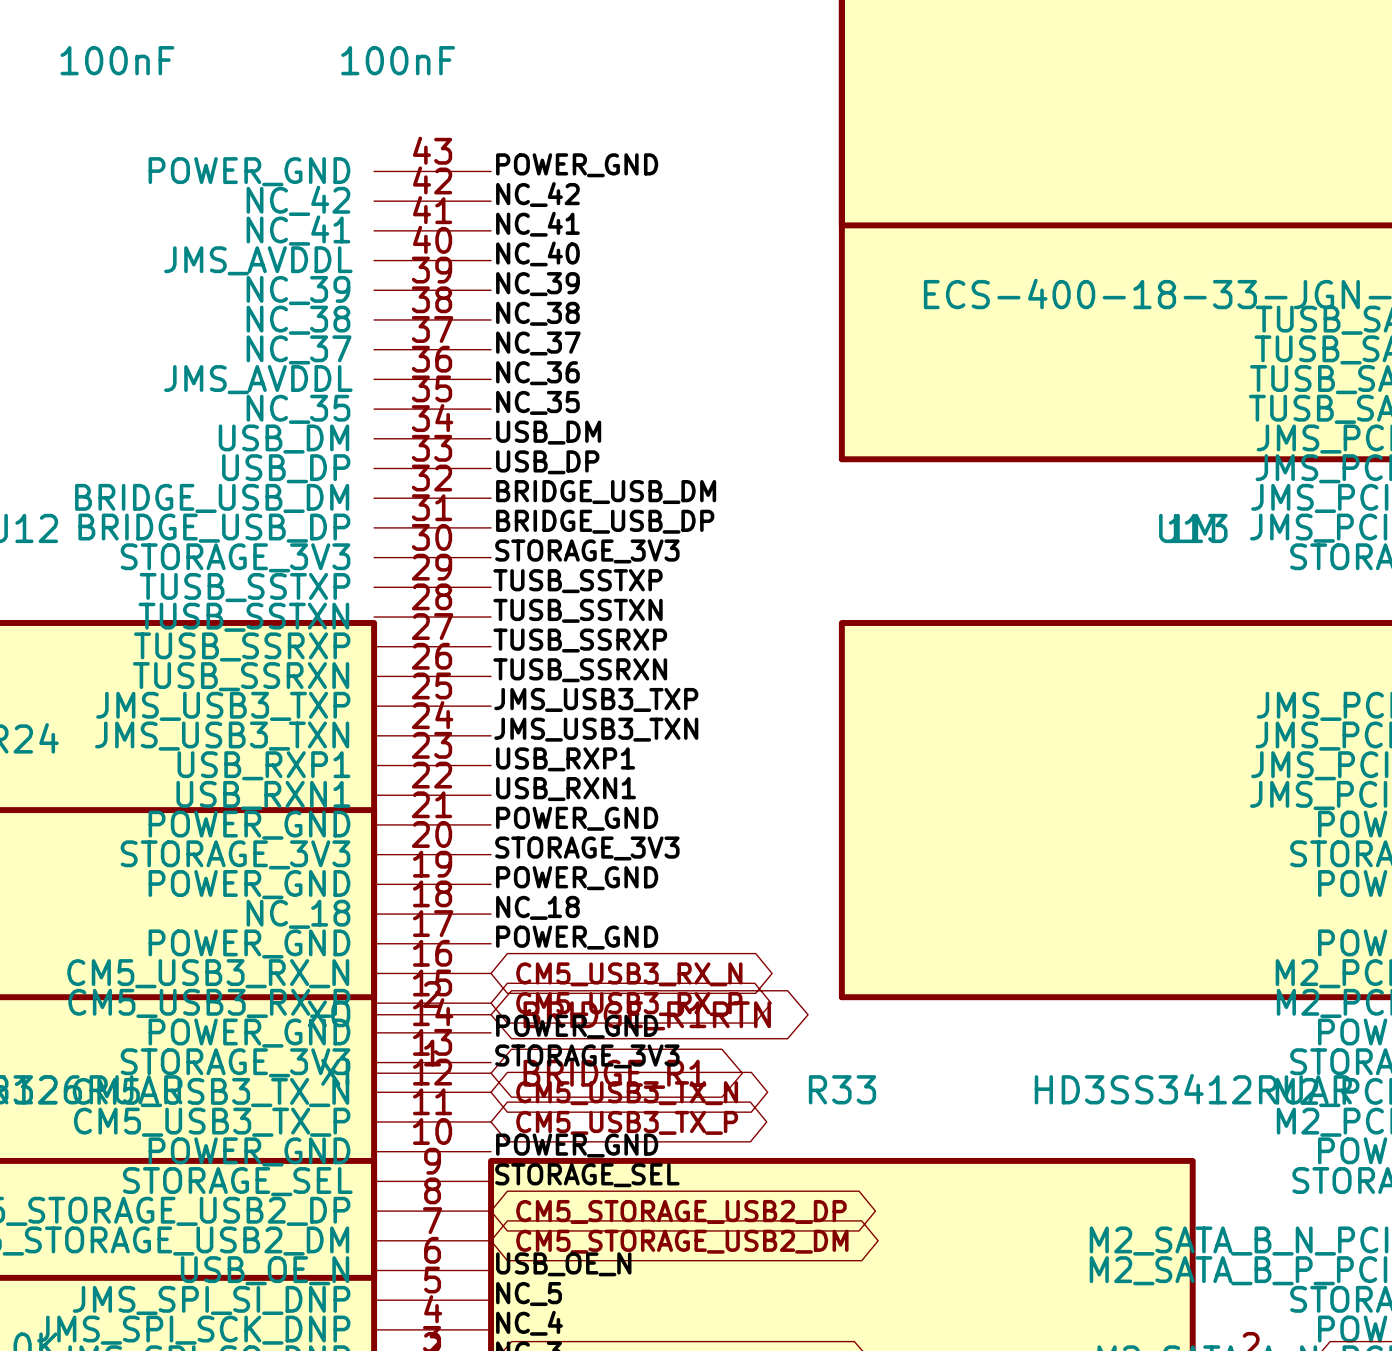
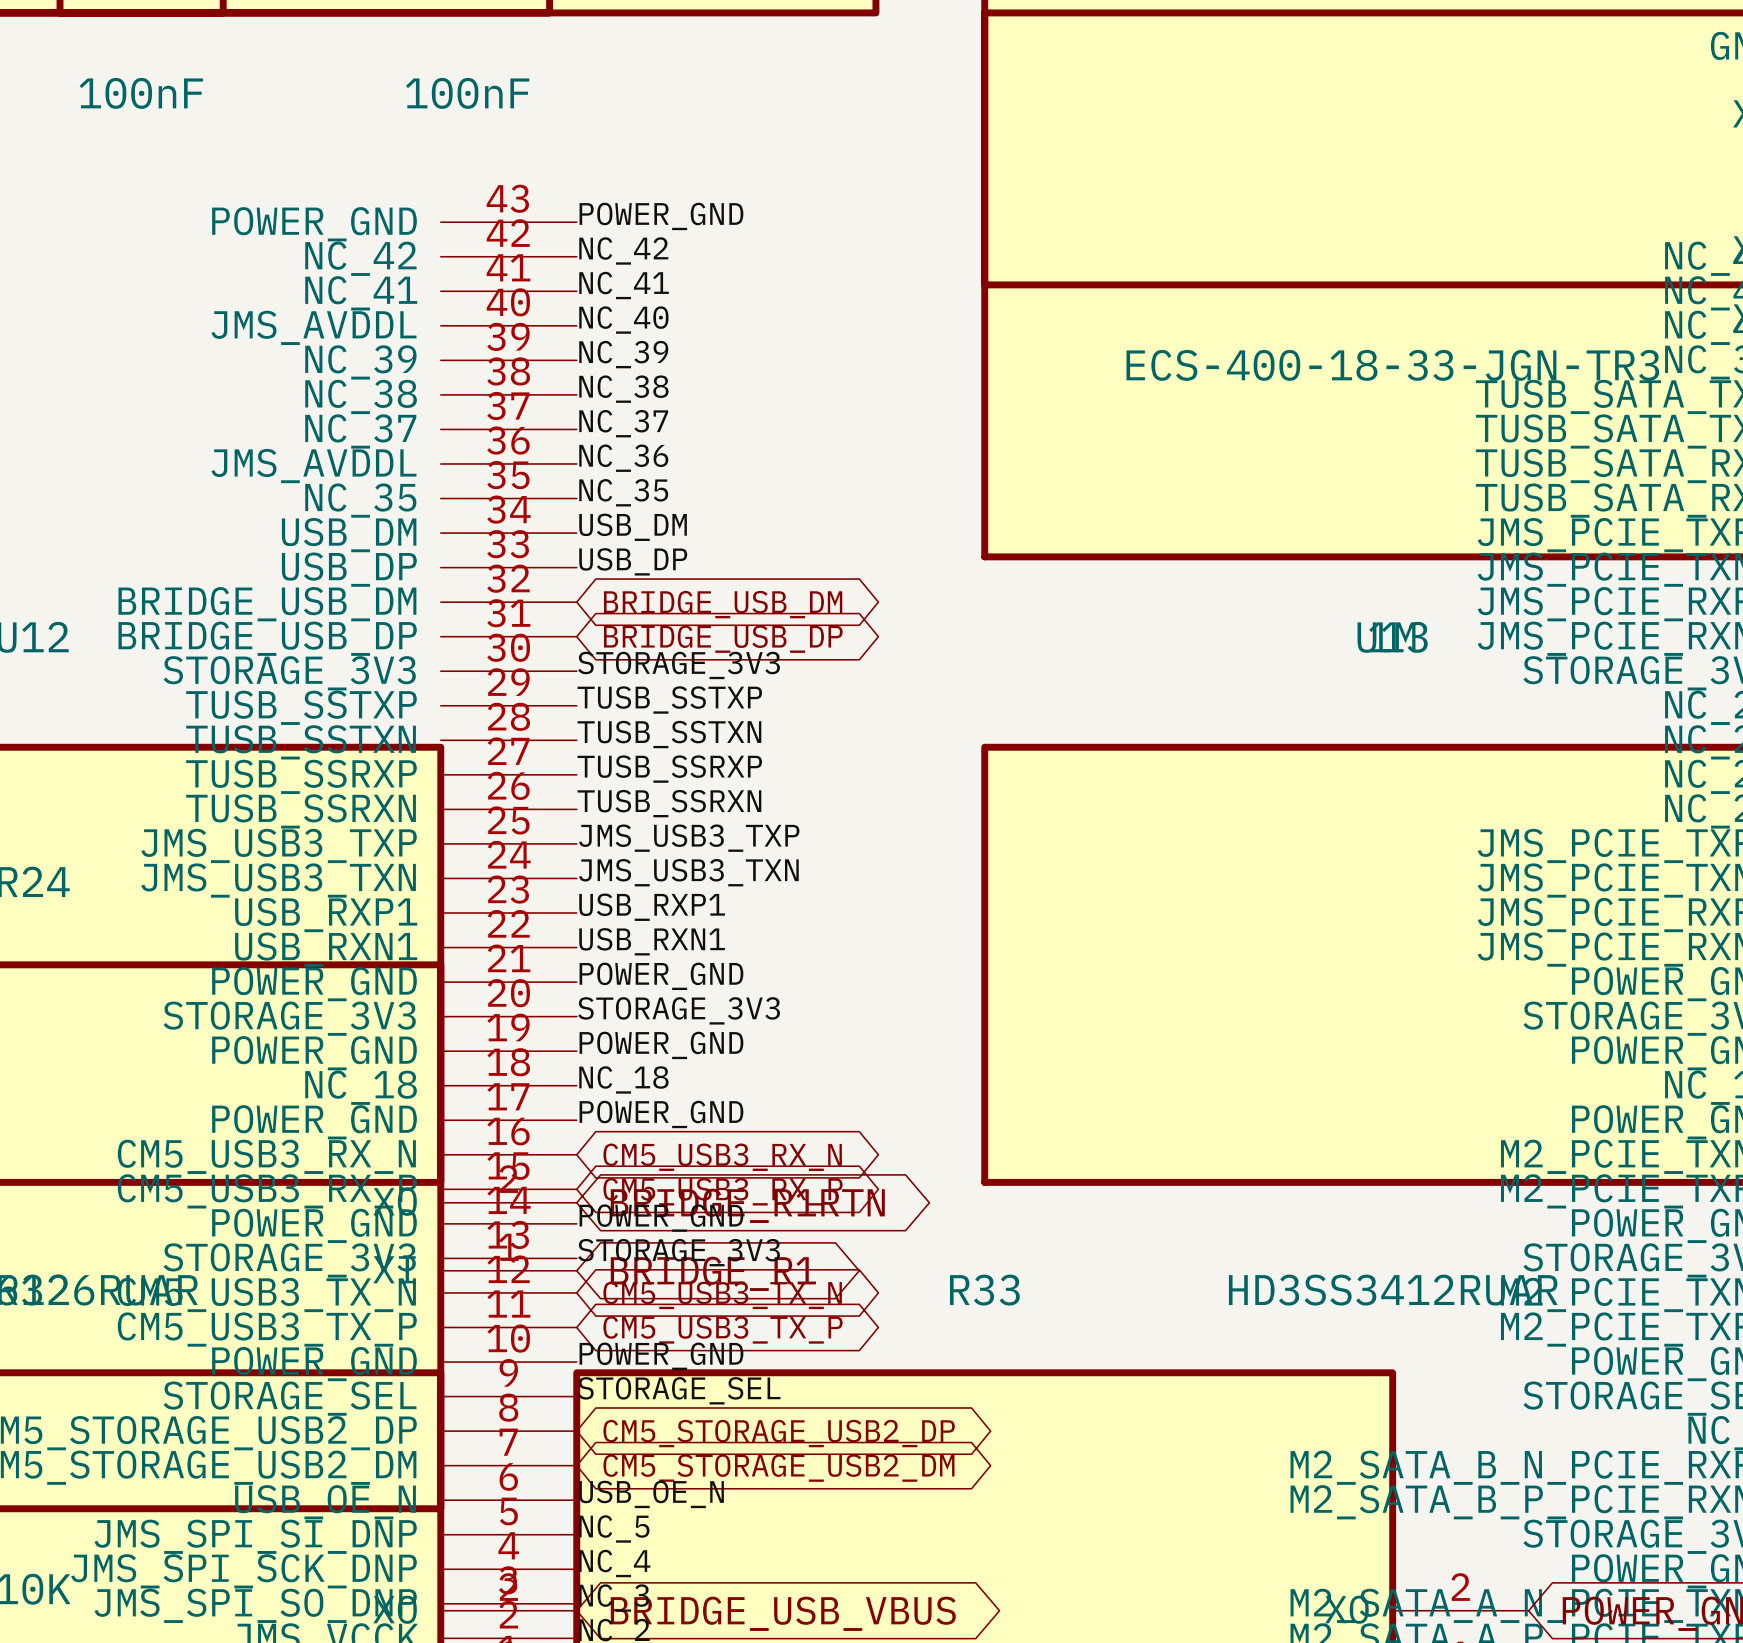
label: BRIDGE_USB_DM (606, 492) -> none
global label: none -> BRIDGE_USB_DM (723, 604)
label: BRIDGE_USB_DP (605, 521) -> none
global label: none -> BRIDGE_USB_DP (723, 639)

